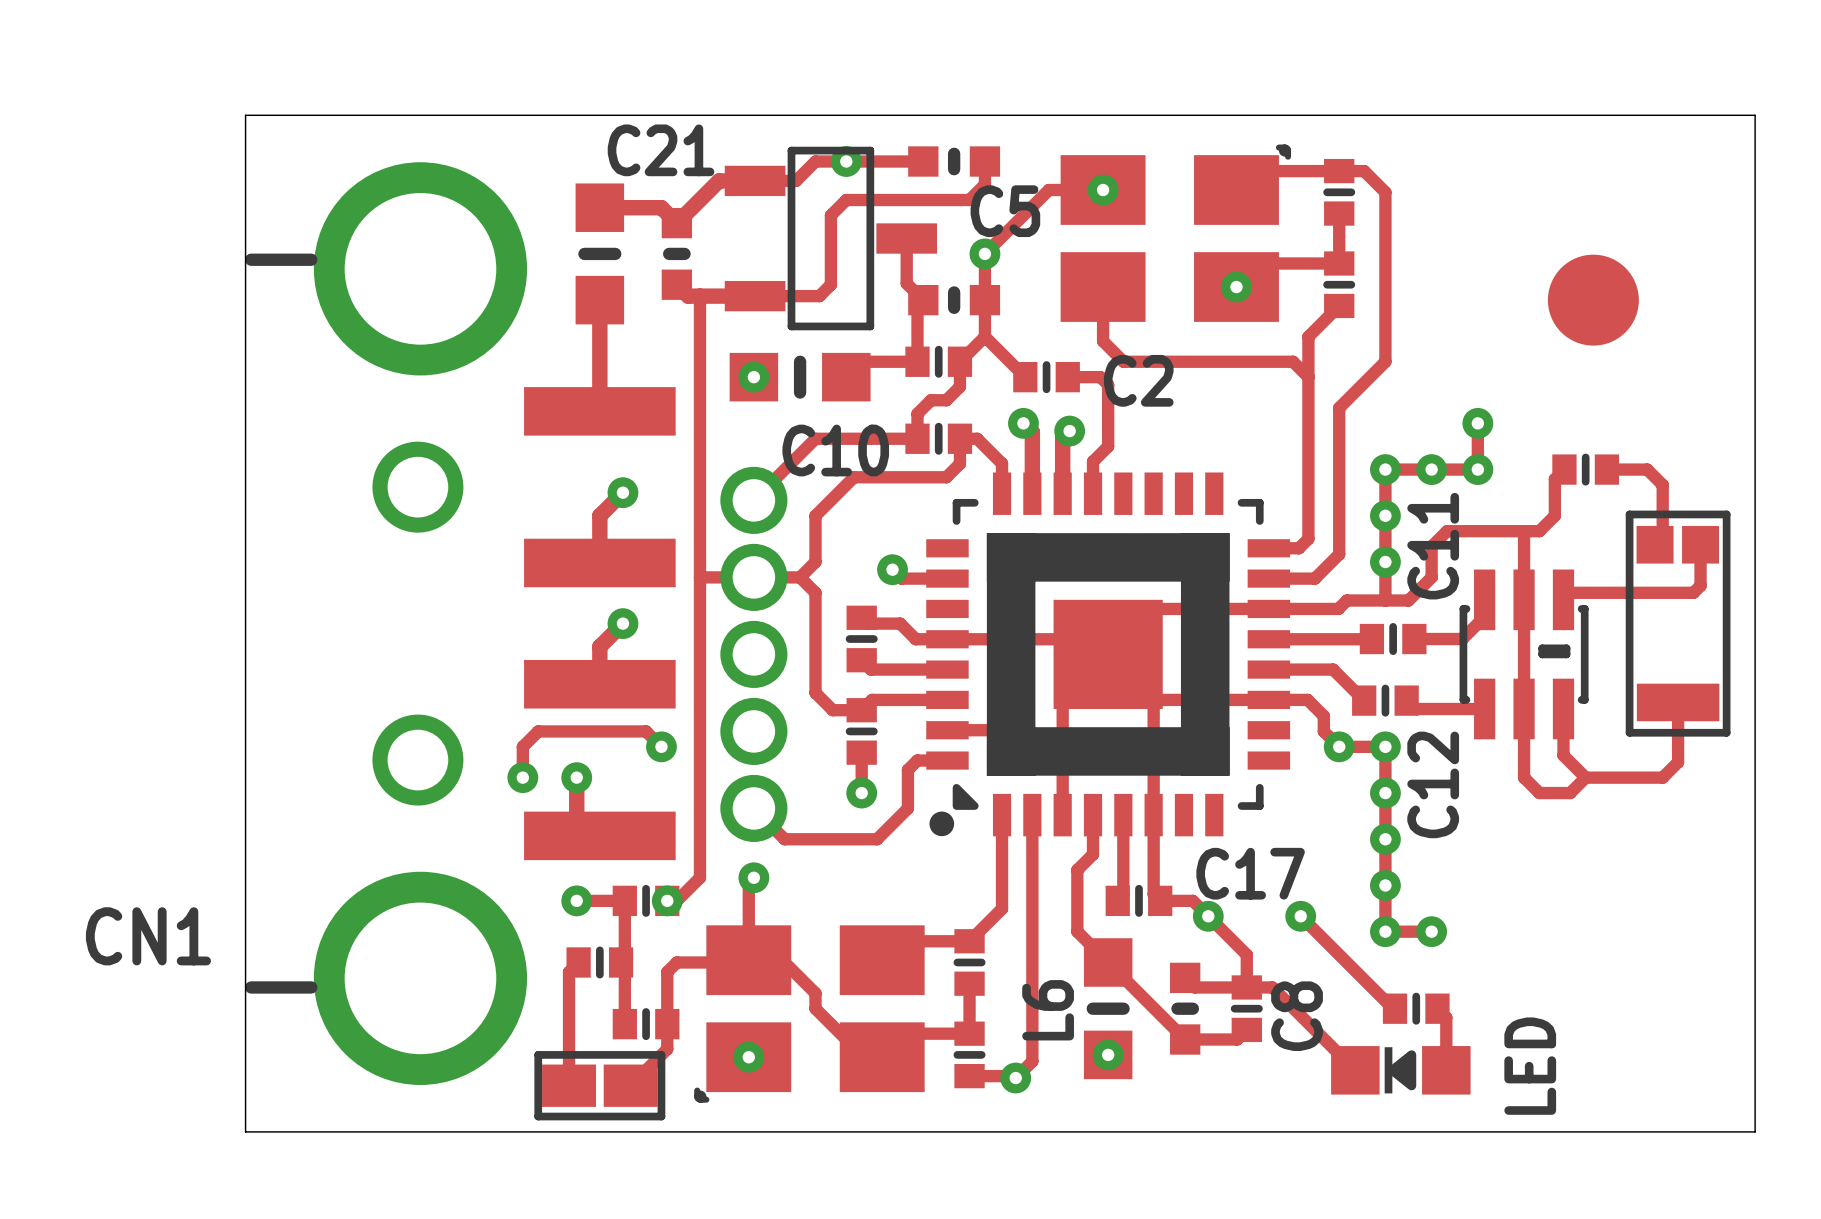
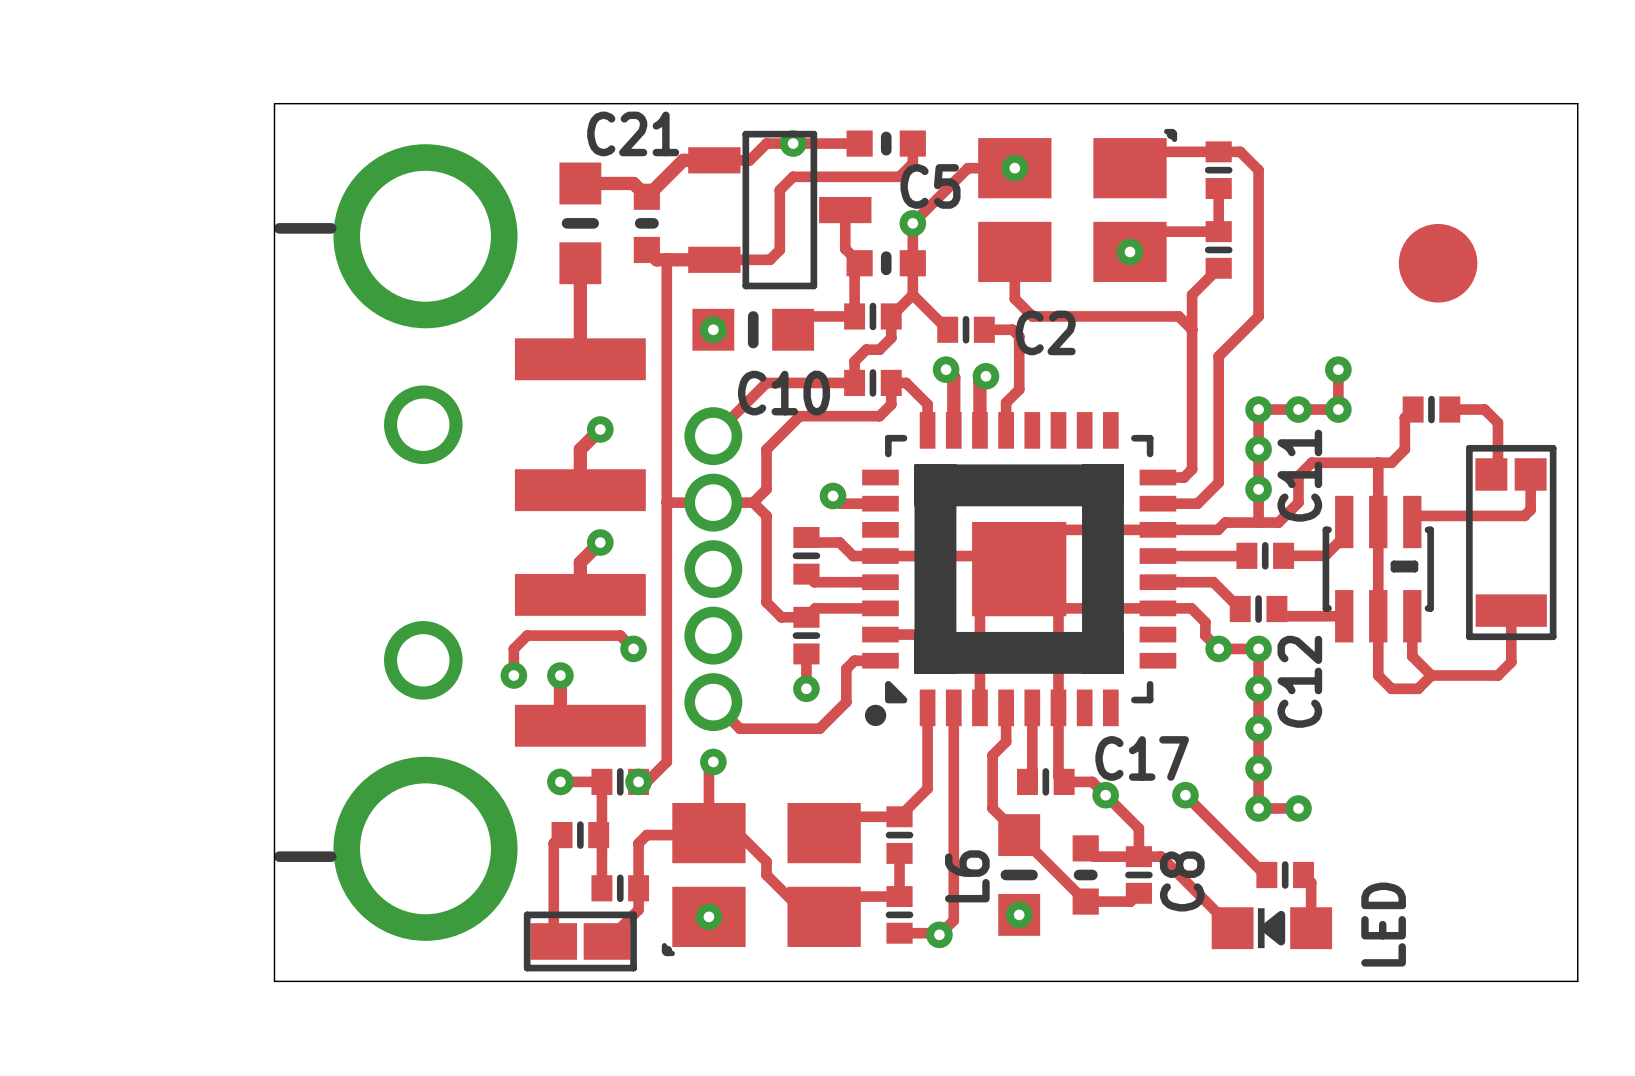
CN1 name: CN1 (148, 936) -> none

